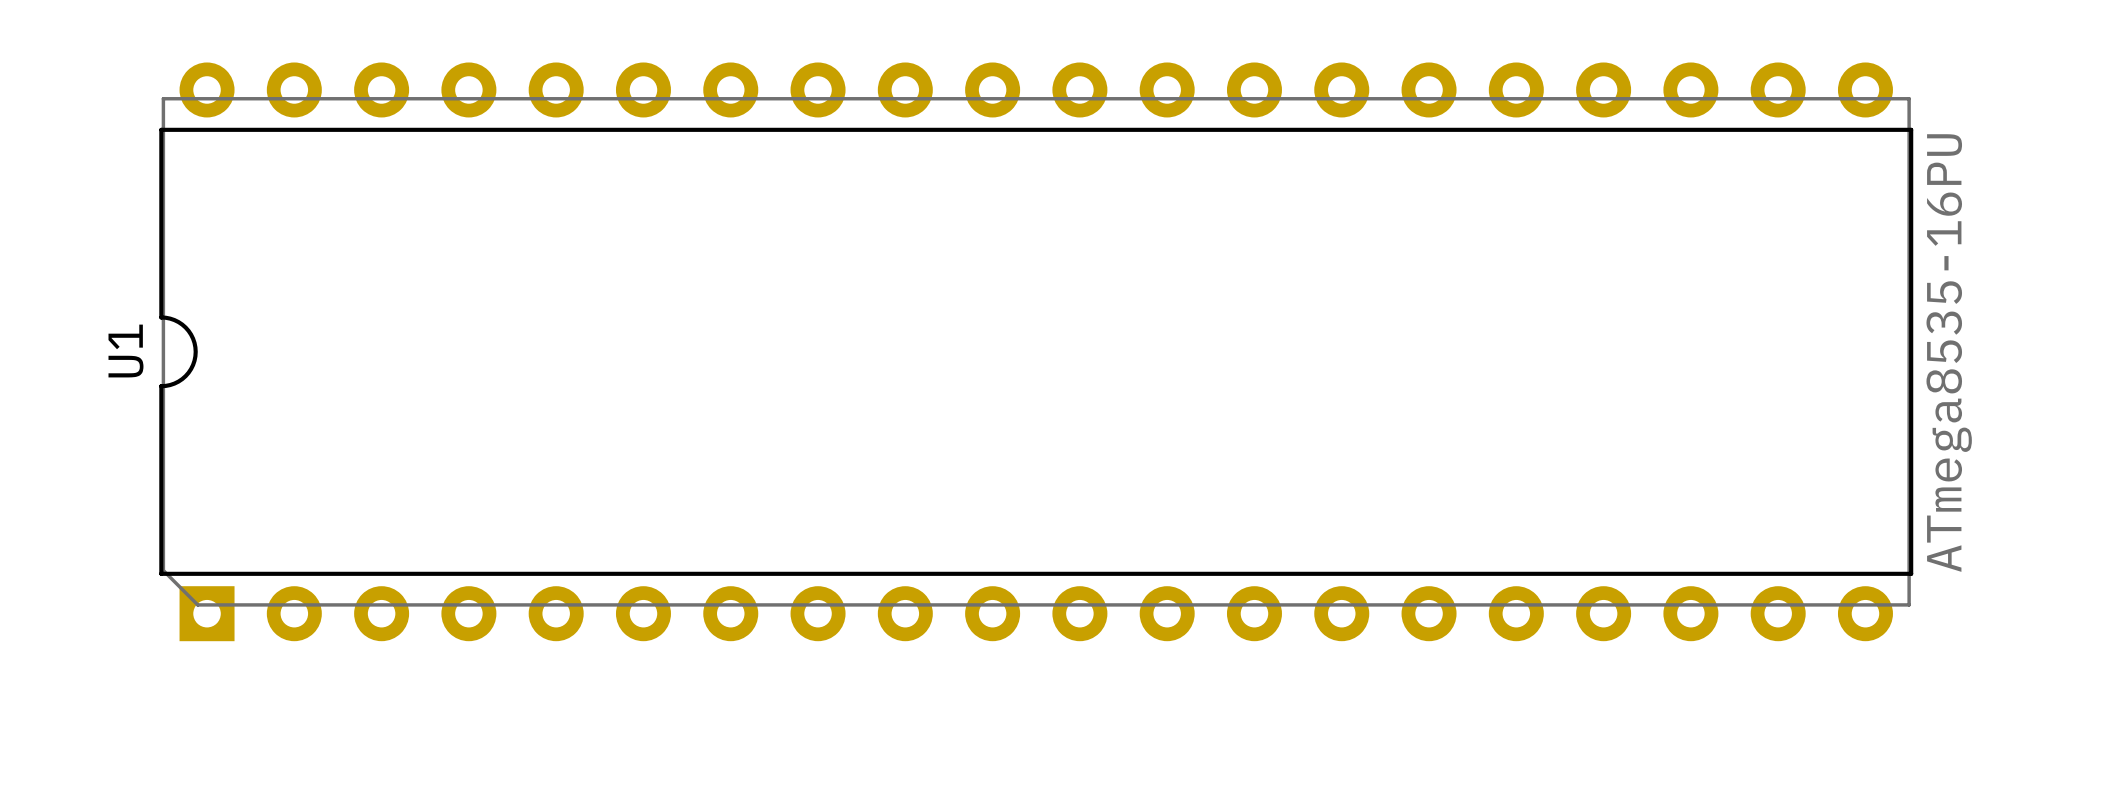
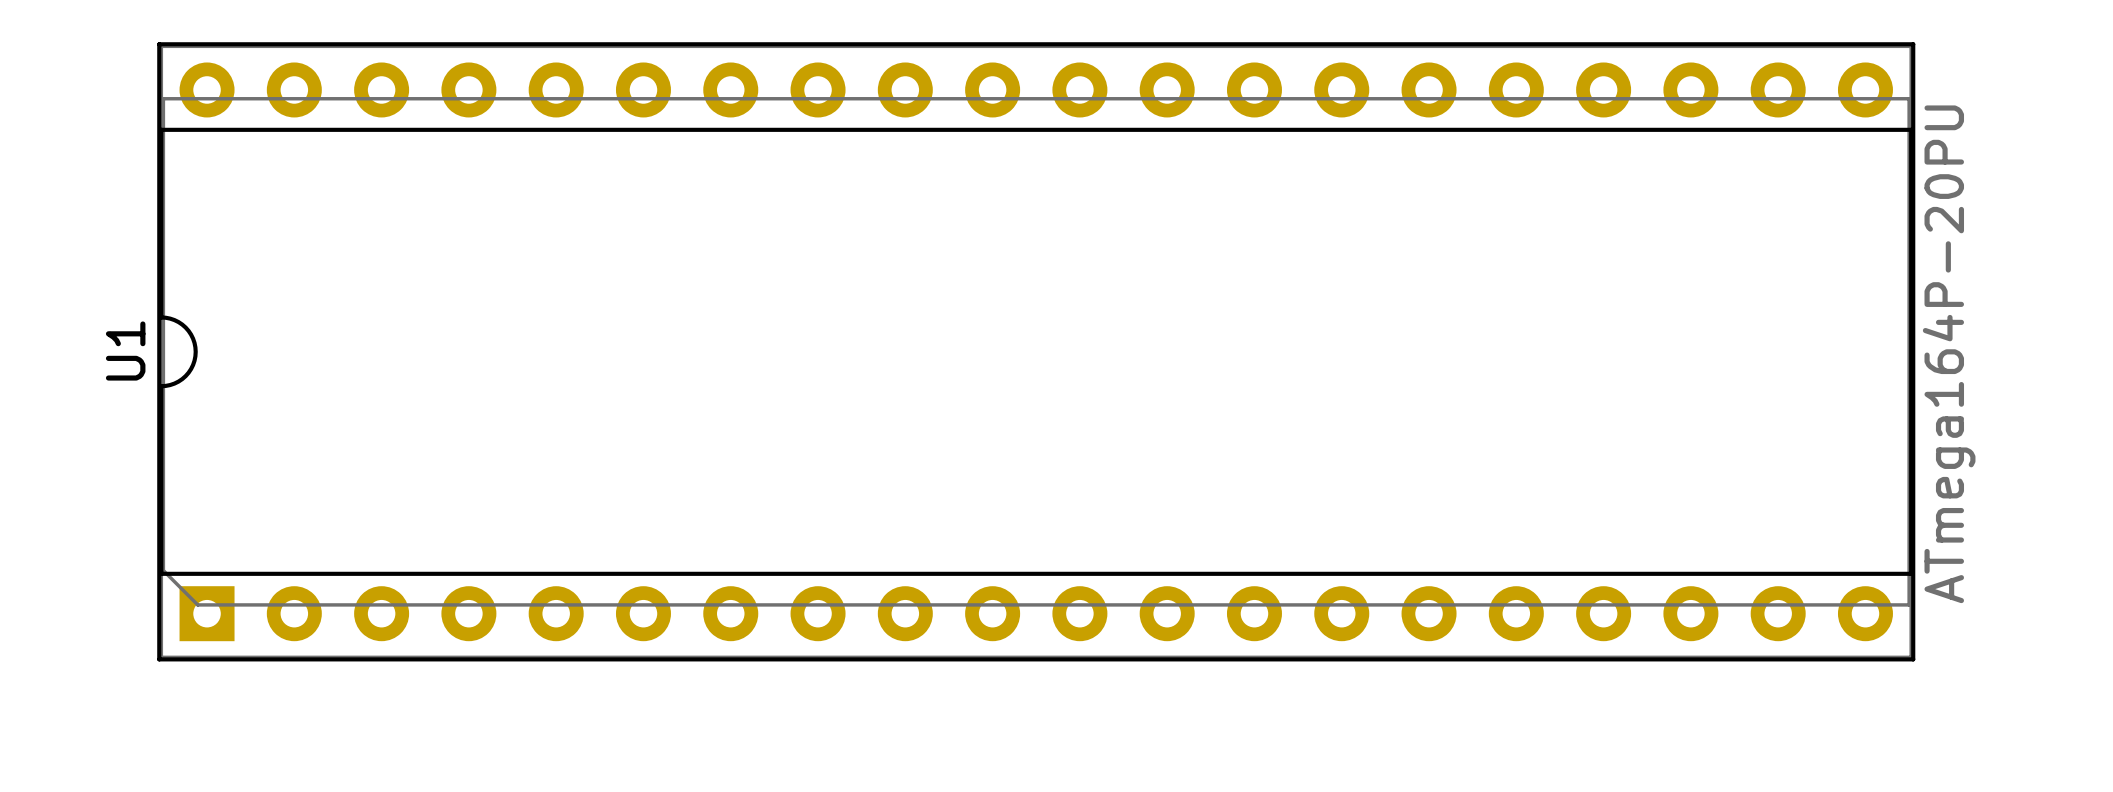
U1 footprint: [159, 62, 1914, 642] -> [157, 42, 1916, 662]
U1 value: ATmega8535-16PU (1949, 353) -> ATmega164P-20PU (1949, 354)

